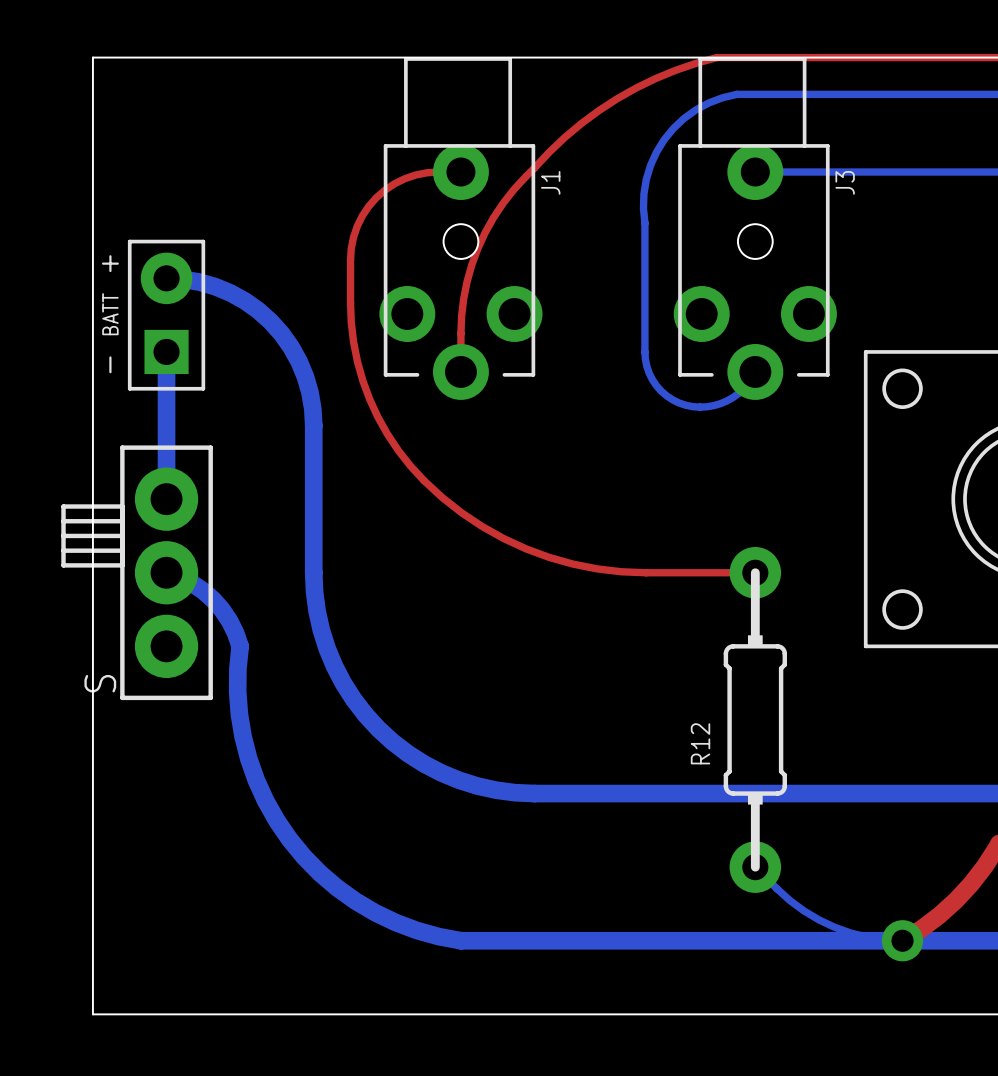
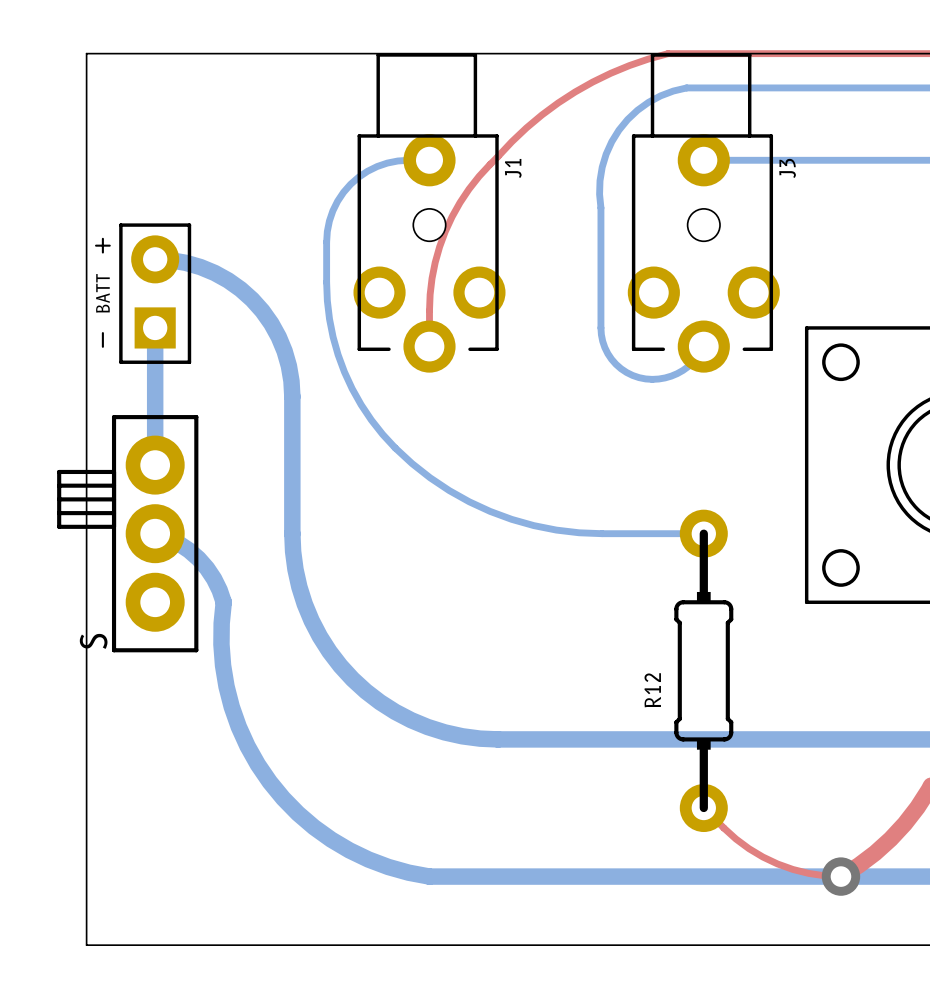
bottom track: none -> (429, 160) (397, 160) (367, 171) (343, 192) (329, 221) (326, 242) (326, 282) (333, 337) (352, 388) (371, 420) (395, 447) (430, 477) (469, 501) (511, 519) (556, 530) (579, 532) (703, 533)
top track: (460, 172) (427, 172) (404, 178) (394, 183) (384, 190) (368, 206) (357, 226) (353, 237) (350, 259) (350, 303) (351, 322) (357, 361) (369, 399) (377, 417) (398, 450) (424, 480) (461, 512) (503, 538) (549, 557) (597, 568) (621, 571) (755, 572) -> none
bottom track: (755, 867) (789, 900) (818, 919) (834, 927) (867, 937) (902, 940) -> none
top track: none -> (703, 808) (735, 839) (762, 857) (777, 863) (808, 873) (840, 876)

